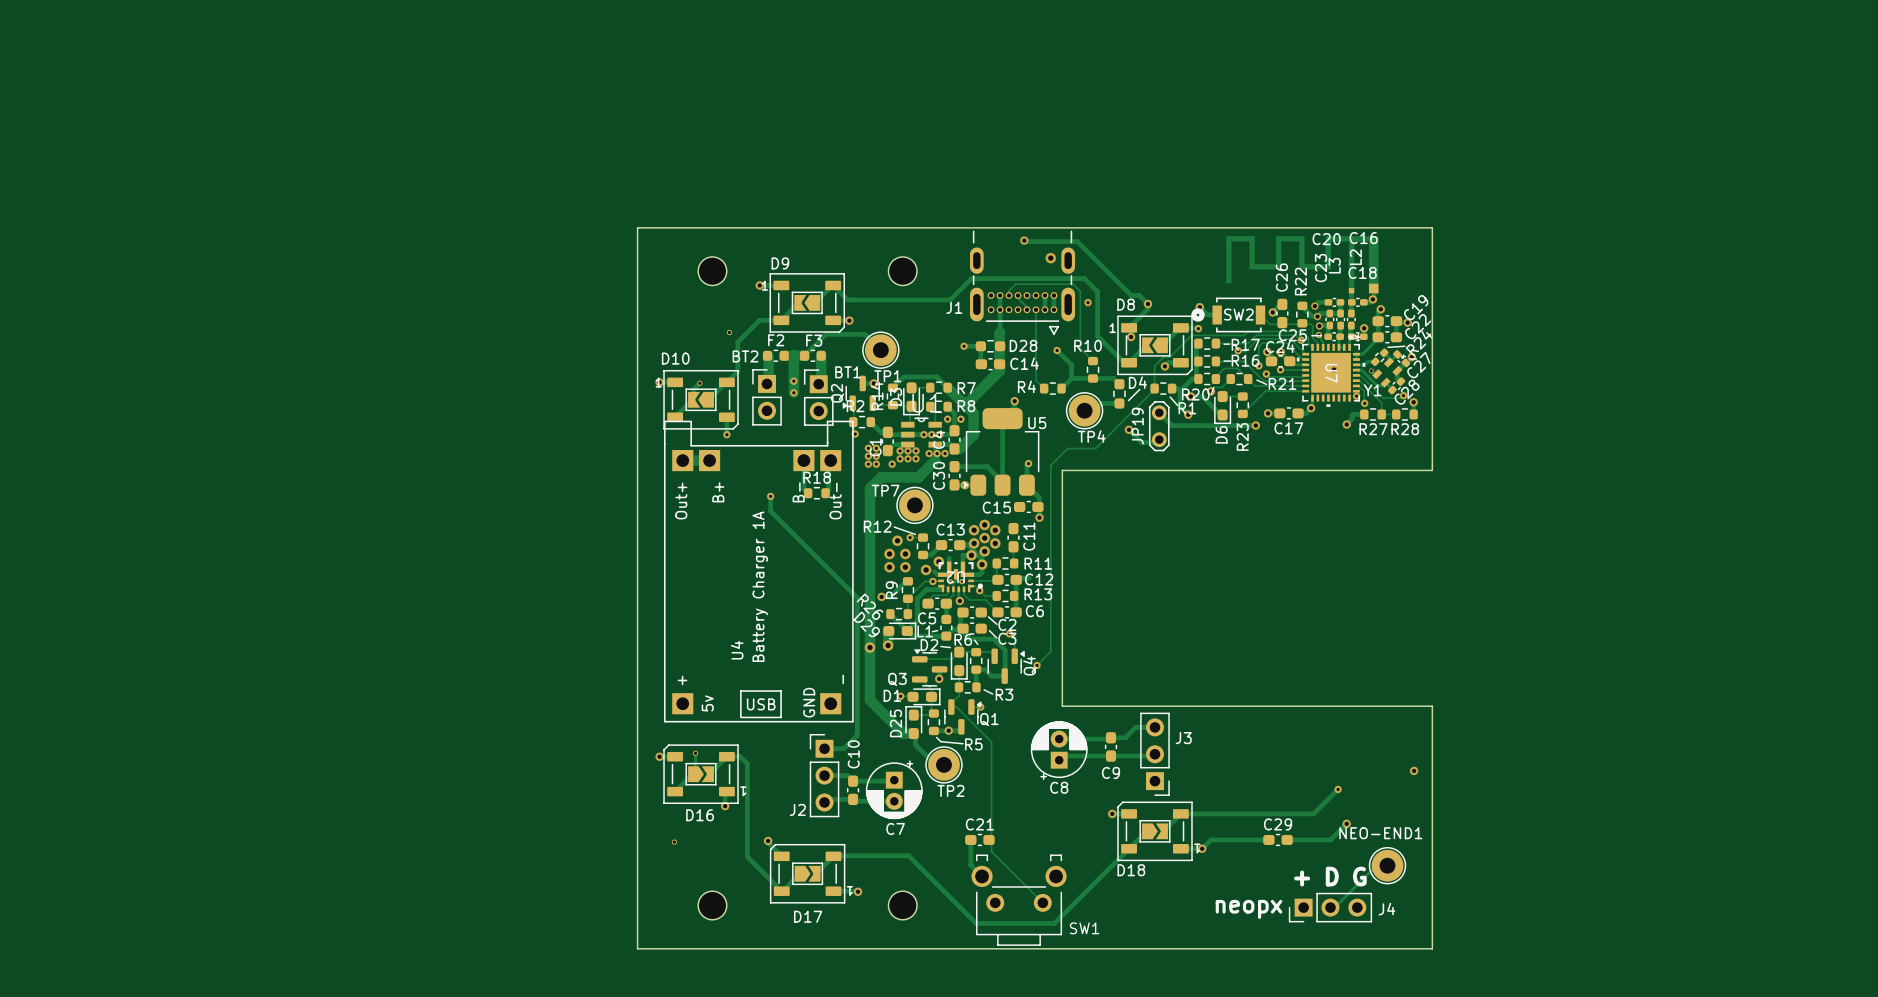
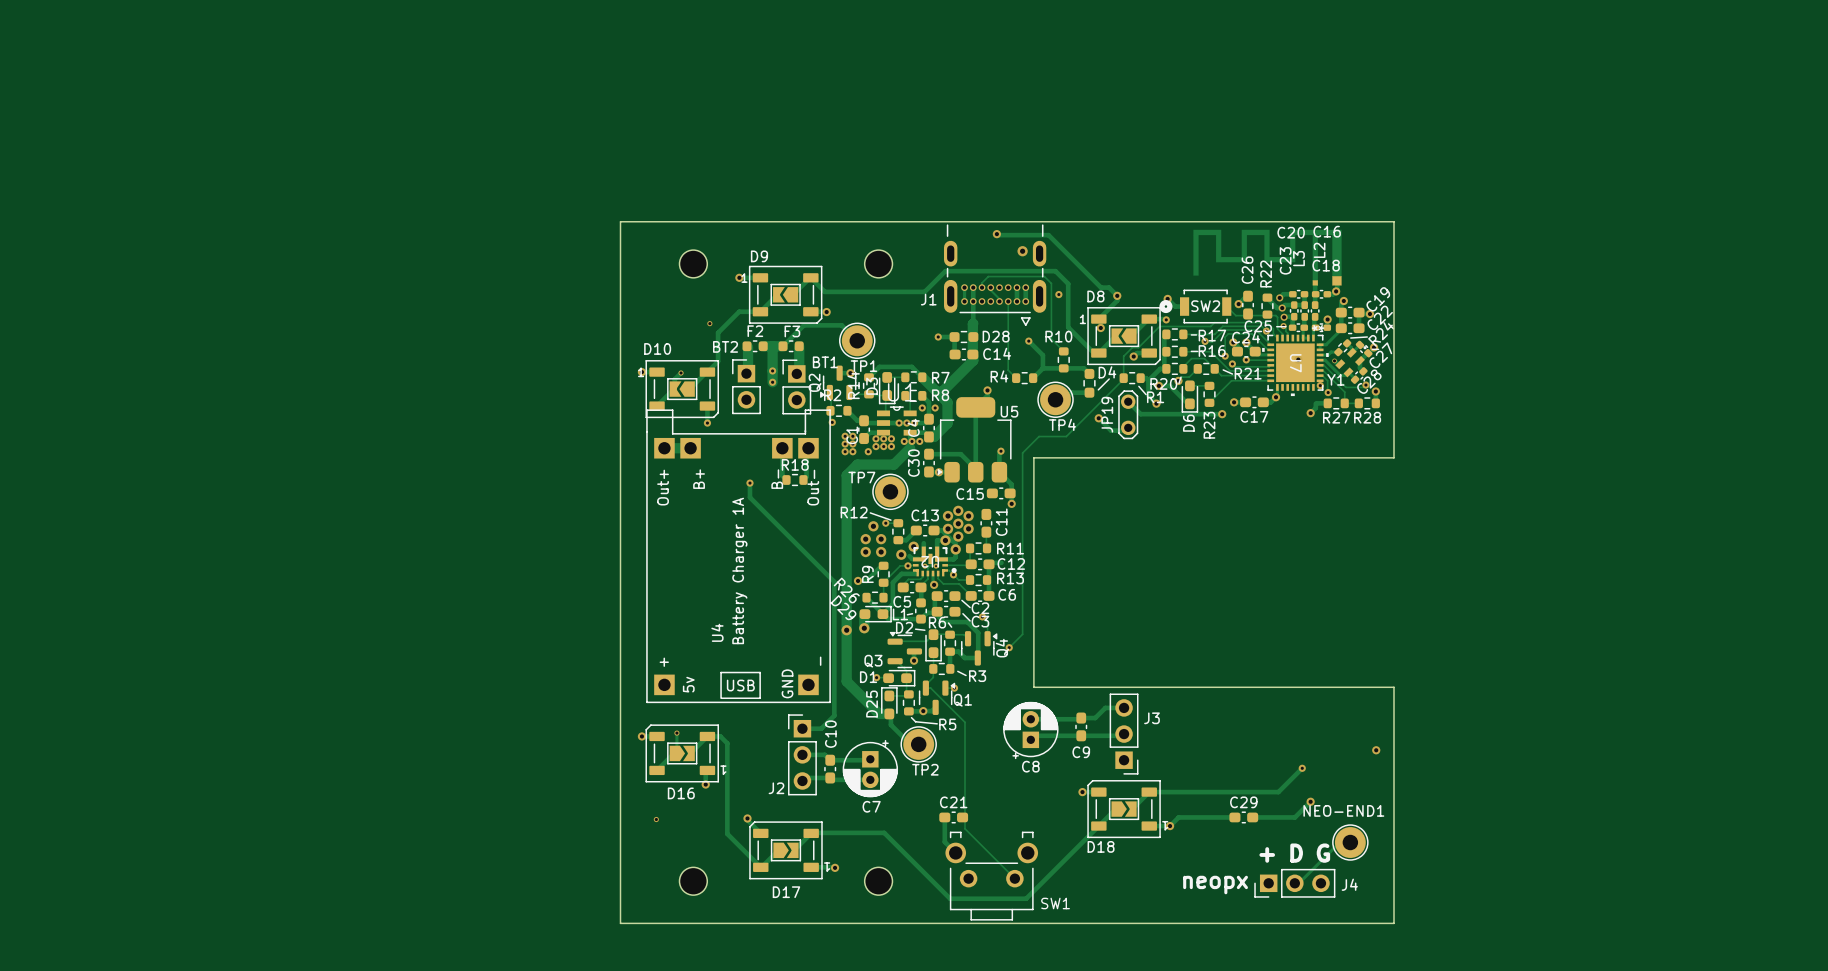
J1 footprint: [969, 230, 1076, 335] -> [944, 224, 1047, 326]

